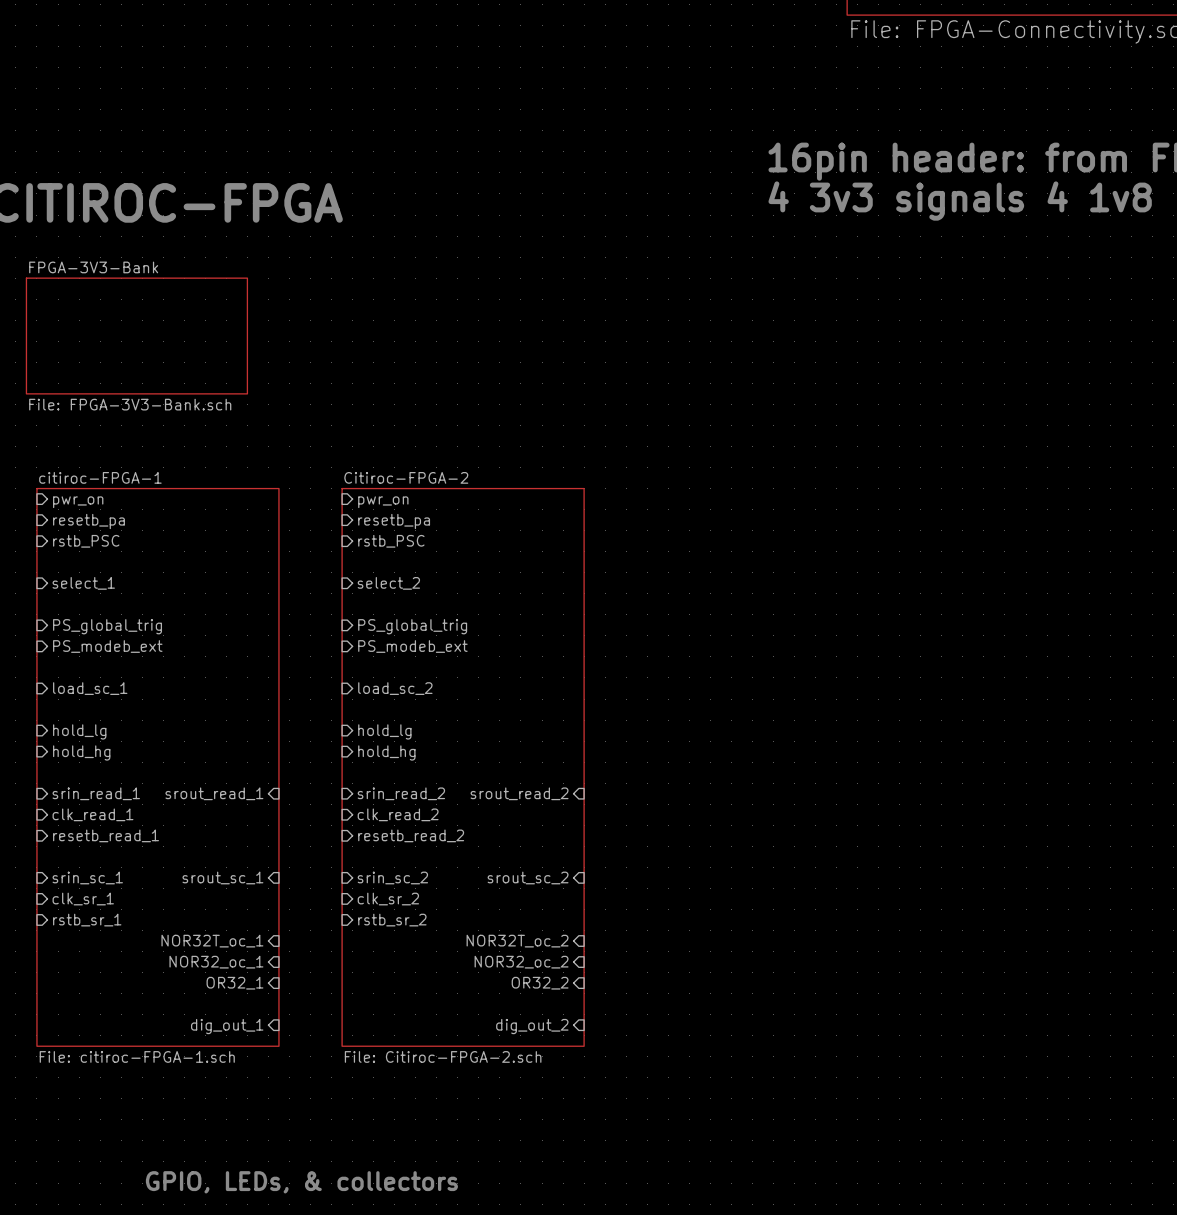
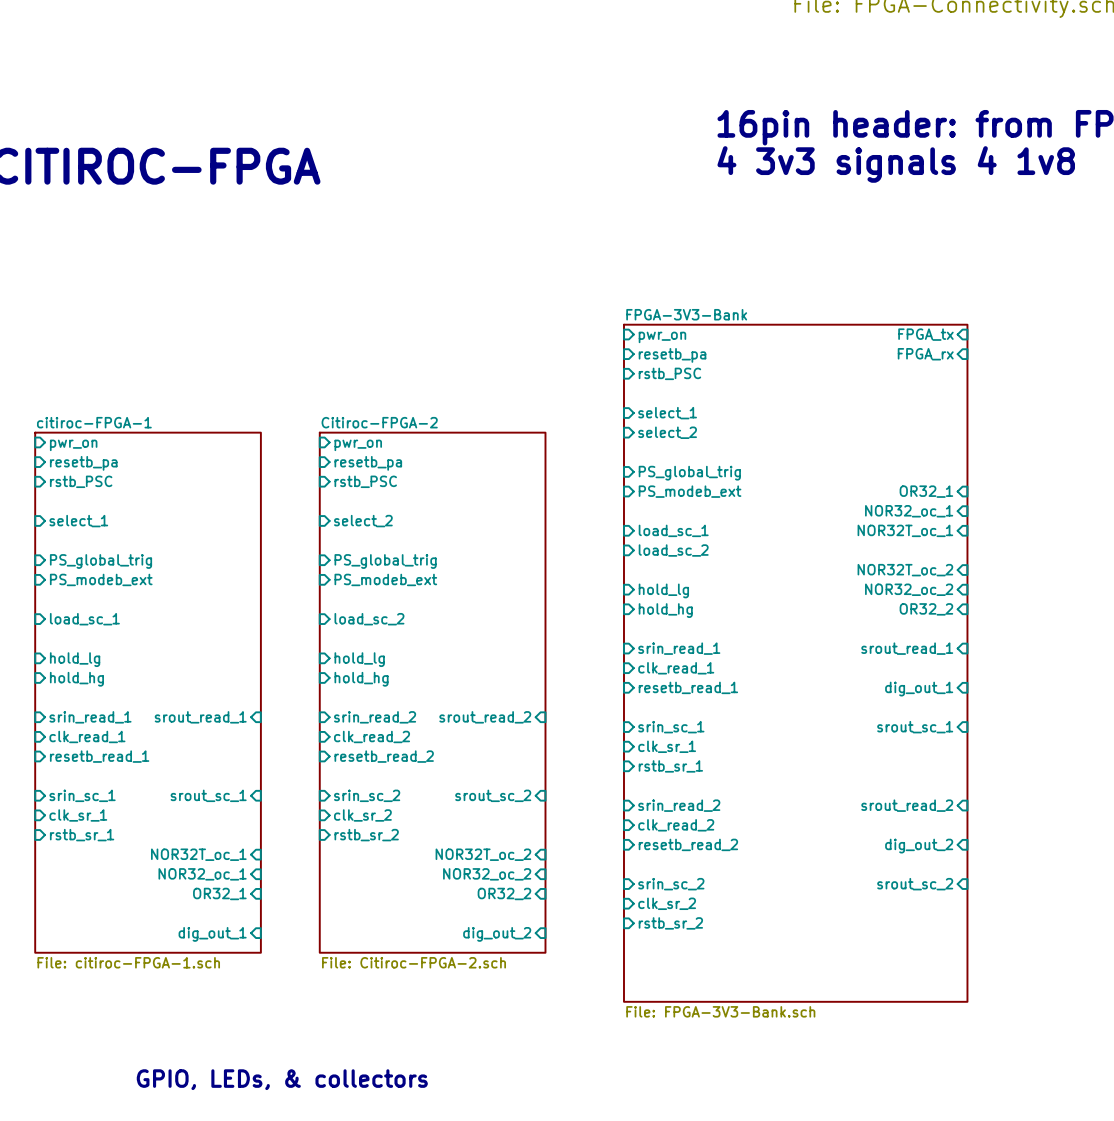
sheet FPGA-3V3-Bank name position: FPGA-3V3-Bank (93, 267) -> FPGA-3V3-Bank (686, 314)
sheet FPGA-3V3-Bank shape: [26, 278, 248, 394] -> [623, 324, 968, 1002]
sheet pin: none -> FPGA_tx (925, 334)
sheet pin: none -> pwr_on (662, 337)
sheet FPGA-3V3-Bank value position: File: FPGA-3V3-Bank.sch (130, 404) -> File: FPGA-3V3-Bank.sch (720, 1011)
sheet pin: none -> FPGA_rx (925, 354)
sheet pin: none -> resetb_pa (672, 355)
sheet pin: none -> rstb_PSC (669, 373)
sheet pin: none -> select_1 (667, 413)
sheet pin: none -> select_2 (667, 432)
sheet pin: none -> PS_global_trig (689, 473)
sheet pin: none -> PS_modeb_ext (690, 491)
sheet pin: none -> OR32_1 (926, 491)
sheet pin: none -> NOR32_oc_1 (909, 511)
sheet pin: none -> load_sc_1 (673, 530)
sheet pin: none -> NOR32T_oc_1 (905, 530)
sheet pin: none -> load_sc_2 (673, 550)
sheet pin: none -> NOR32T_oc_2 (905, 570)
sheet pin: none -> NOR32_oc_2 (909, 589)
sheet pin: none -> hold_lg (663, 590)
sheet pin: none -> OR32_2 (926, 609)
sheet pin: none -> hold_hg (665, 610)
sheet pin: none -> srin_read_1 (679, 648)
sheet pin: none -> srout_read_1 (907, 648)
sheet pin: none -> clk_read_1 (676, 668)
sheet pin: none -> resetb_read_1 (688, 687)
sheet pin: none -> dig_out_1 (919, 689)
sheet pin: none -> srin_sc_1 (671, 727)
sheet pin: none -> srout_sc_1 (915, 727)
sheet pin: none -> clk_sr_1 (667, 746)
sheet pin: none -> rstb_sr_1 (670, 766)
sheet pin: none -> srin_read_2 (679, 805)
sheet pin: none -> srout_read_2 (907, 805)
sheet pin: none -> clk_read_2 (676, 825)
sheet pin: none -> resetb_read_2 (688, 844)
sheet pin: none -> dig_out_2 (919, 846)
sheet pin: none -> srin_sc_2 (671, 884)
sheet pin: none -> srout_sc_2 (915, 884)
sheet pin: none -> clk_sr_2 (667, 903)
sheet pin: none -> rstb_sr_2 (670, 923)

